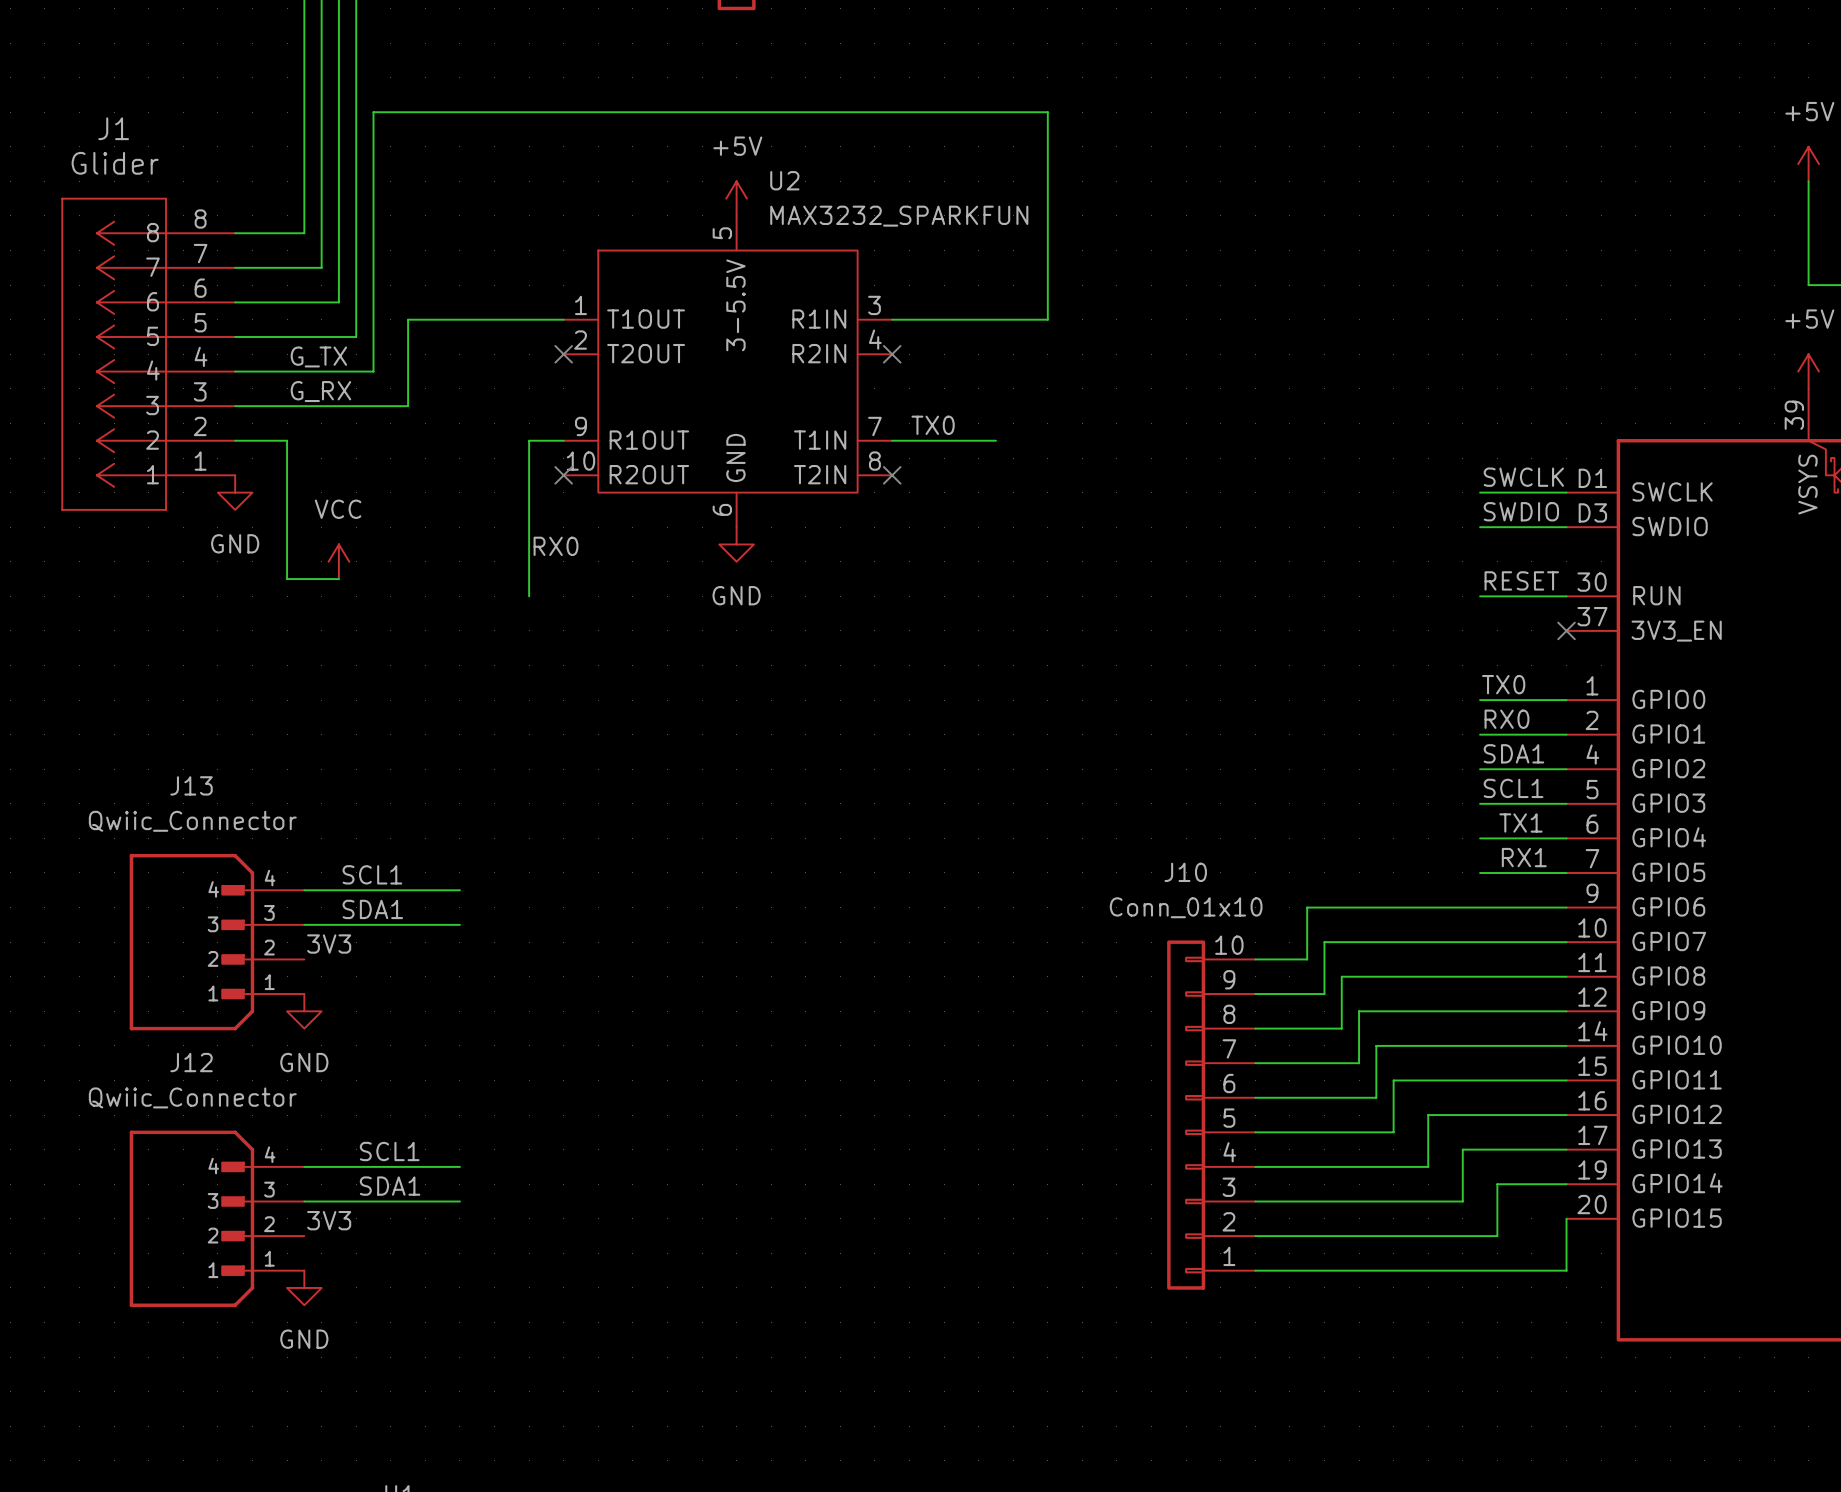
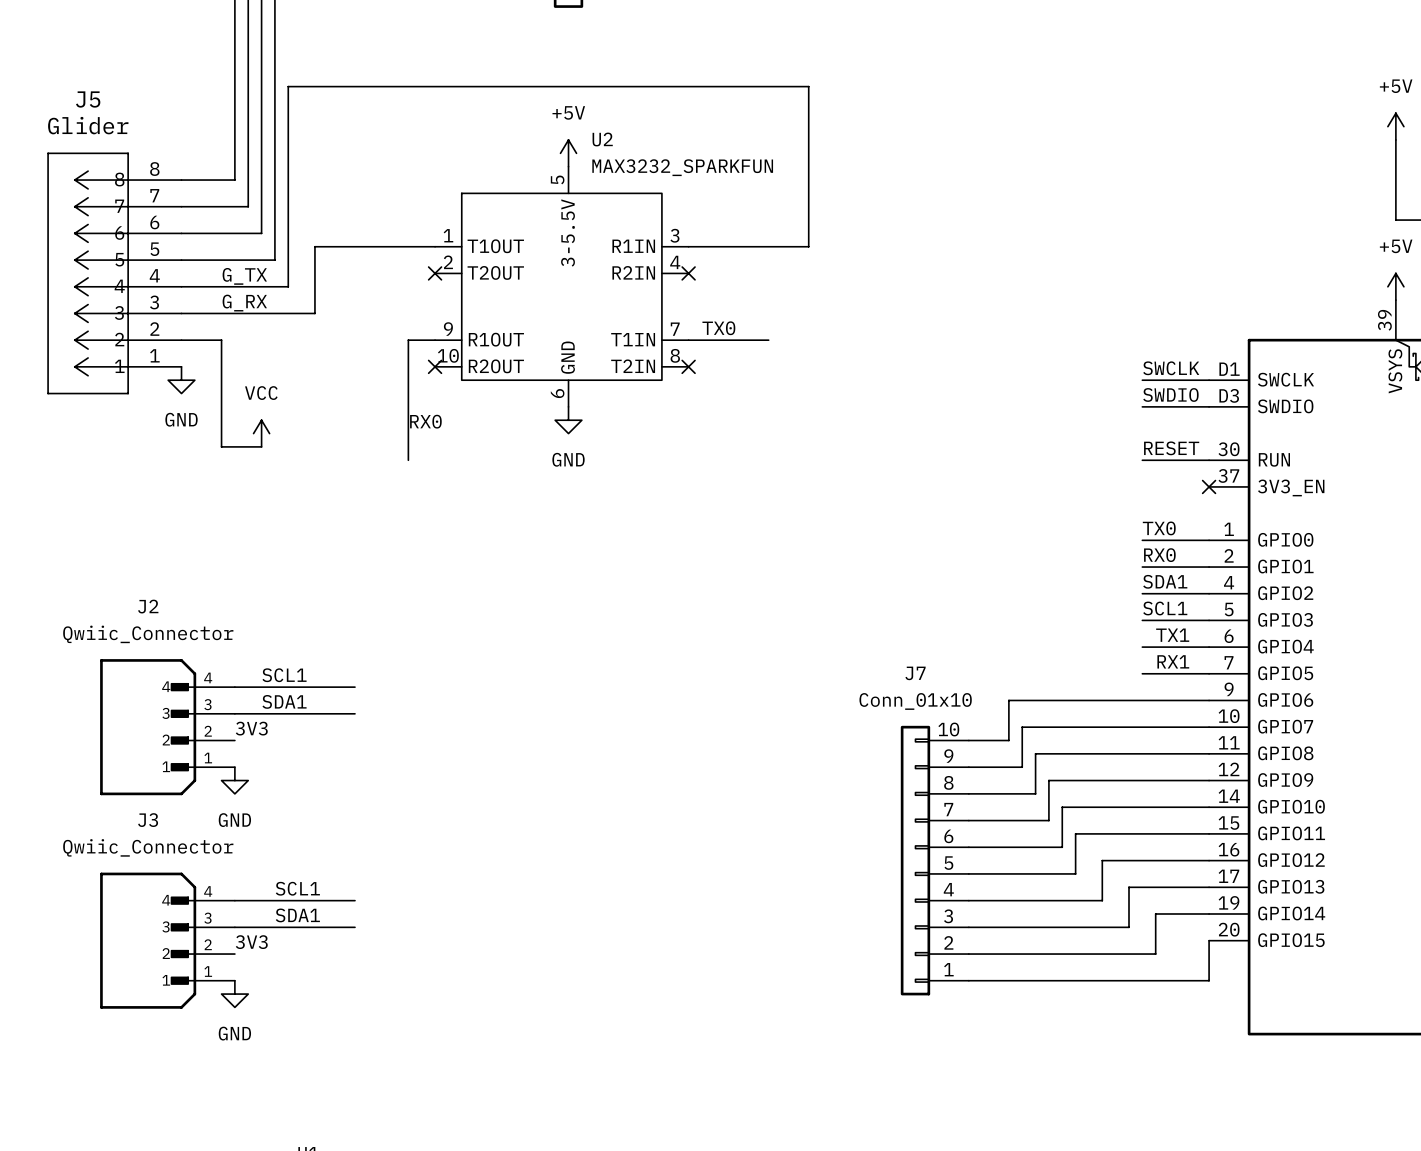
J1 name: J1 (113, 128) -> J5 (88, 99)
J13 name: J13 (191, 785) -> J2 (148, 606)
J10 name: J10 (1185, 872) -> J7 (915, 673)
J12 name: J12 (191, 1062) -> J3 (148, 820)

